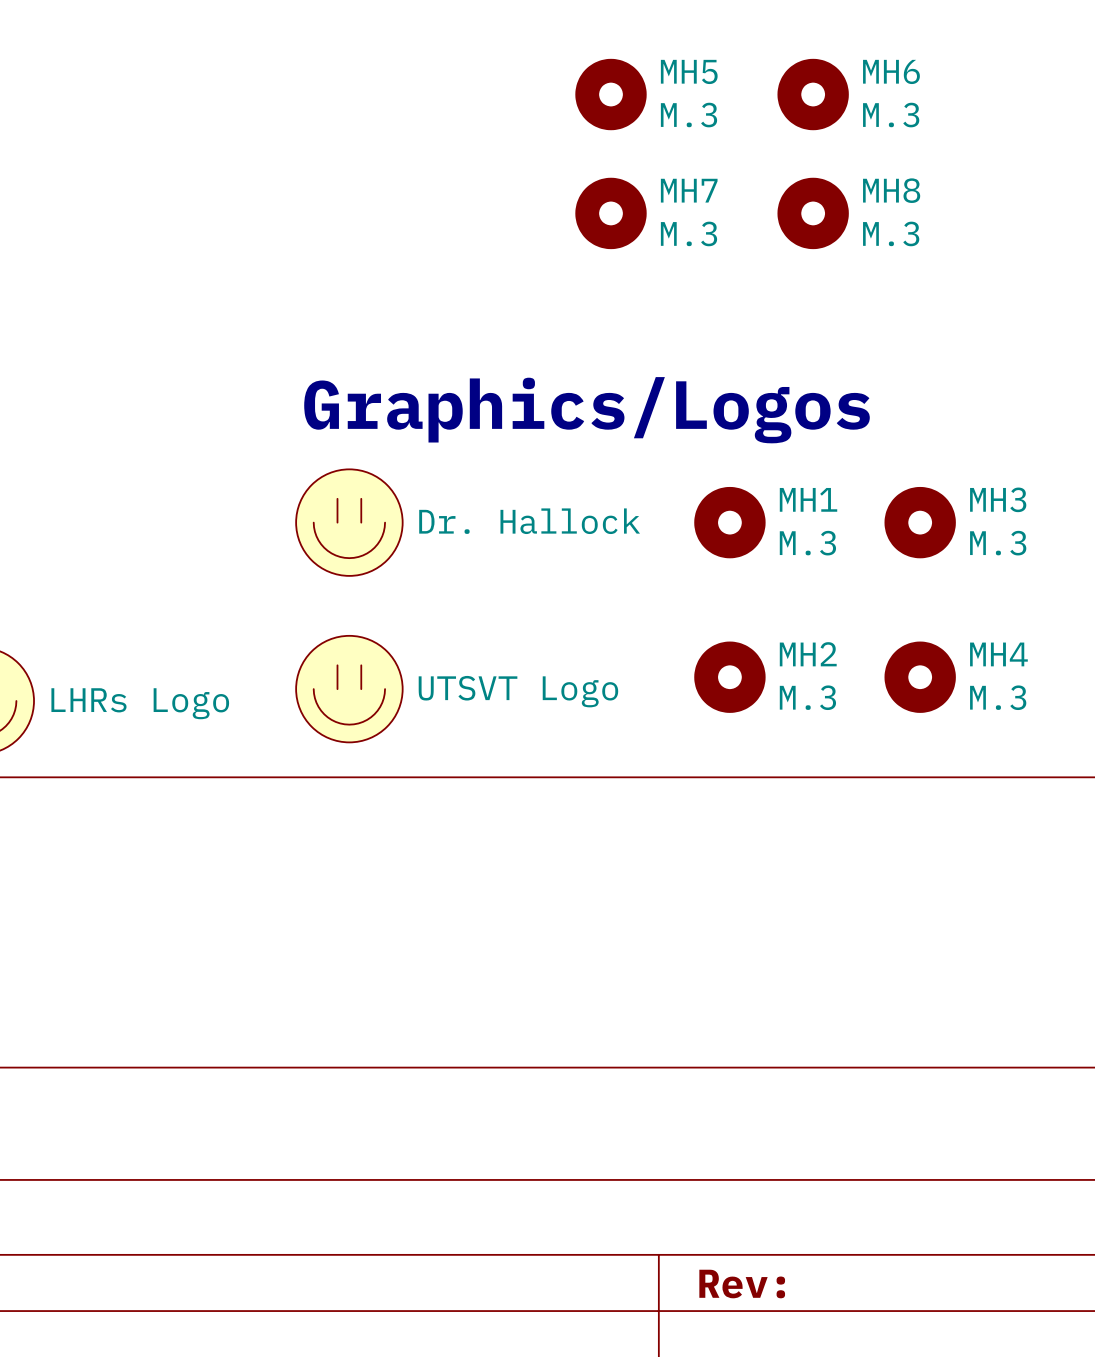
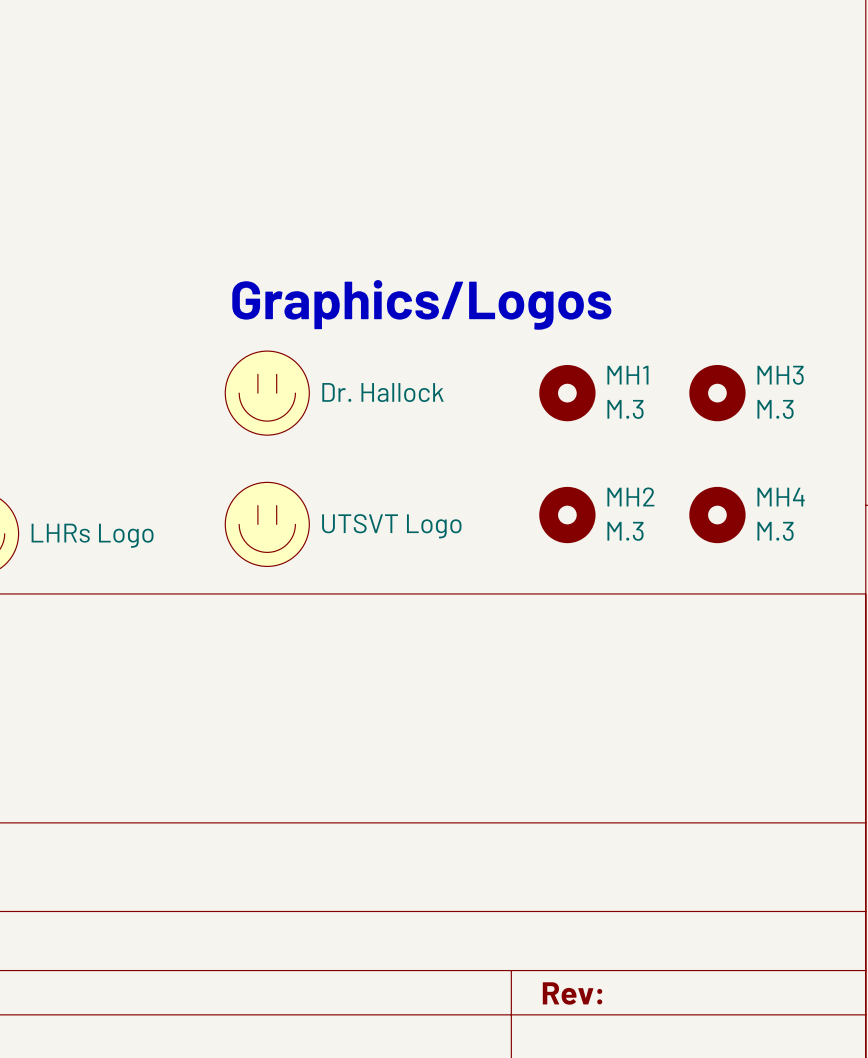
MH5: M.3 (611, 94) -> none
MH6: M.3 (813, 94) -> none
MH7: M.3 (611, 213) -> none
MH8: M.3 (813, 213) -> none

